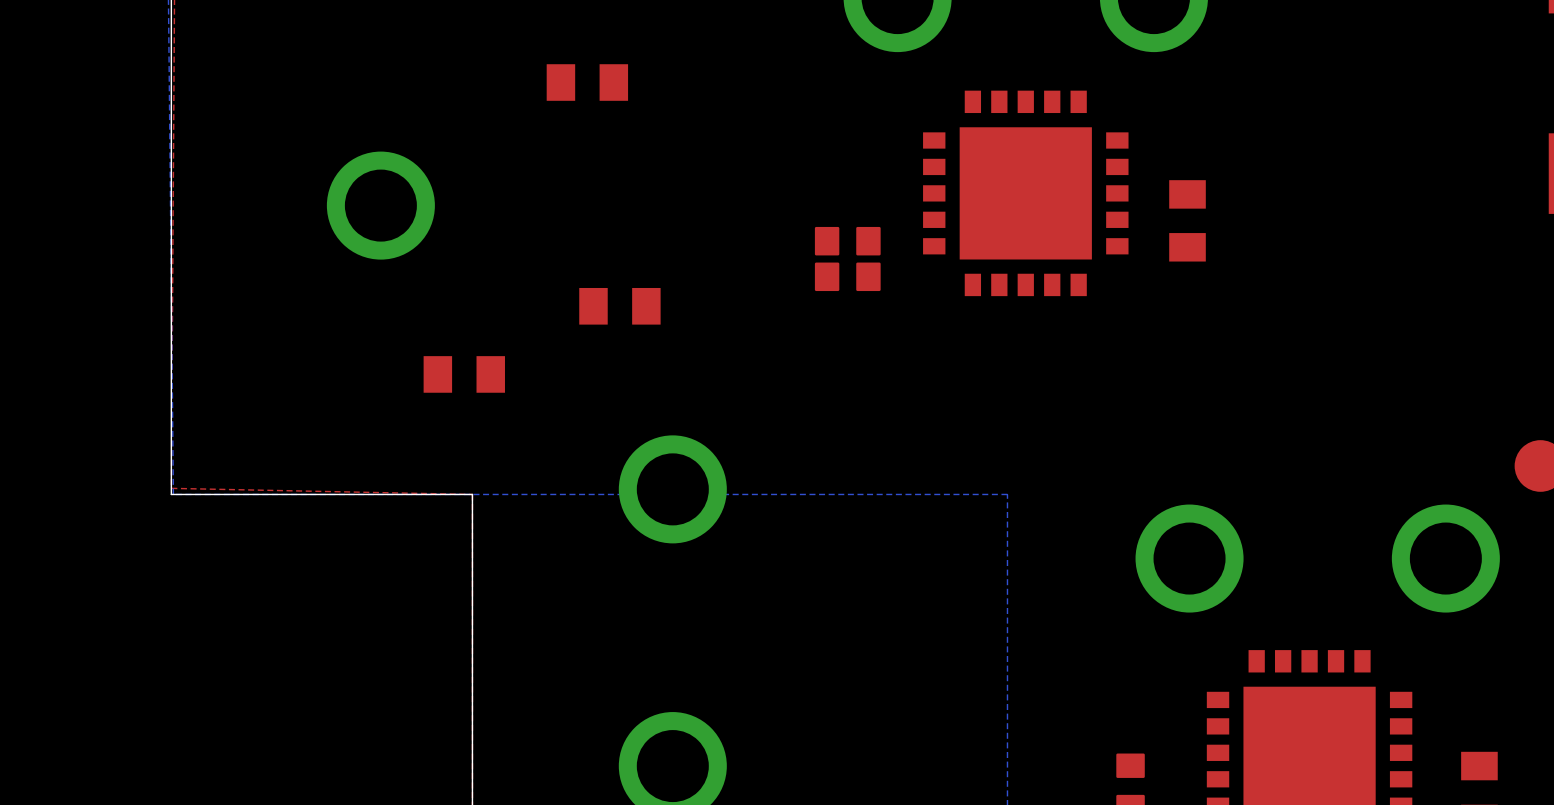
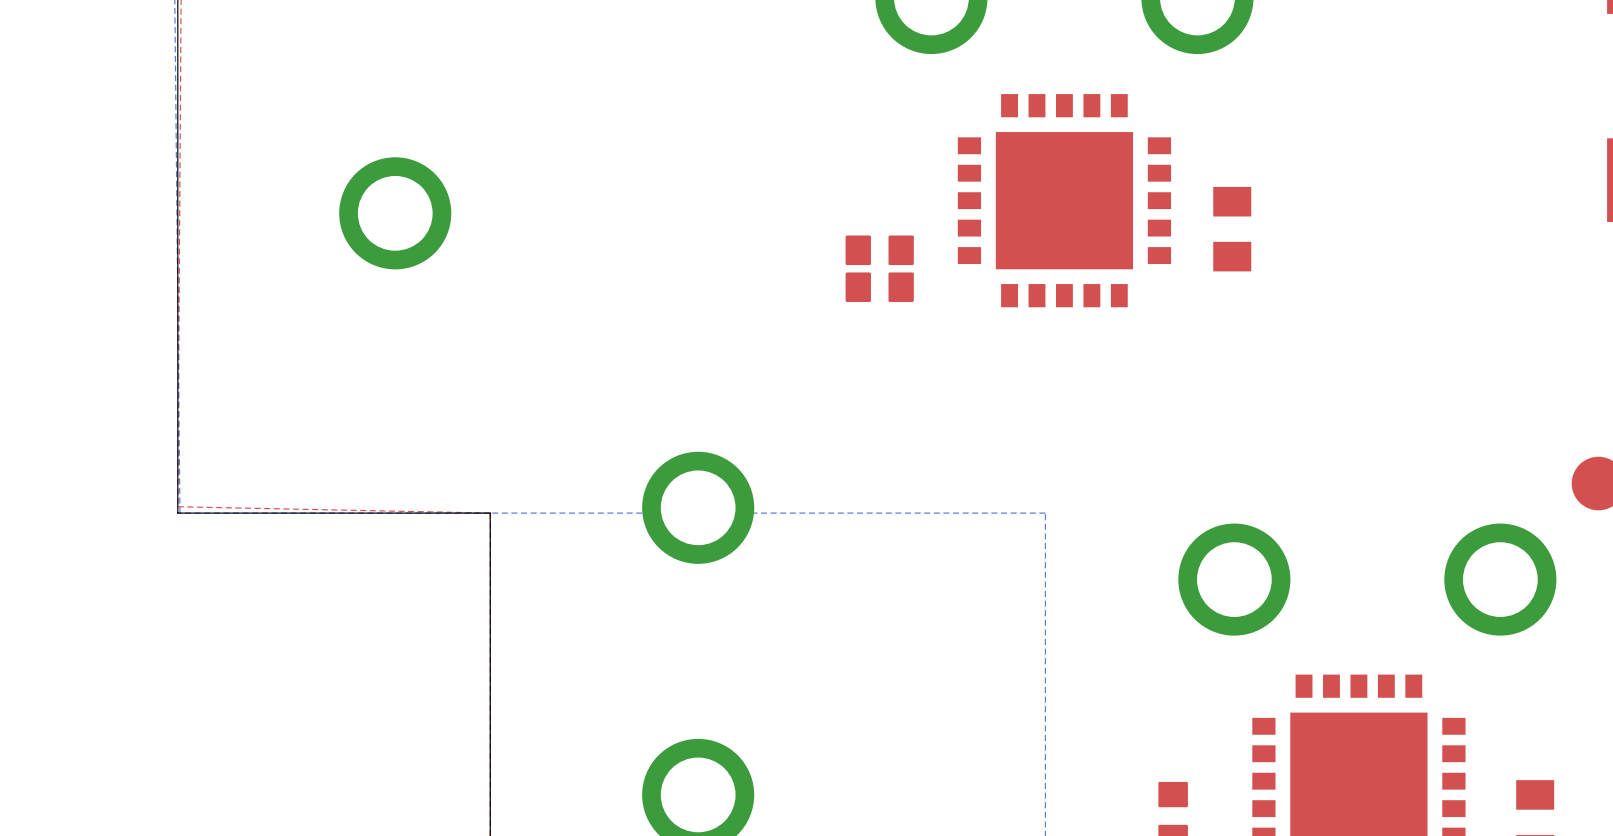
part: (587, 82) -> none
part: (619, 306) -> none
part: (464, 374) -> none

